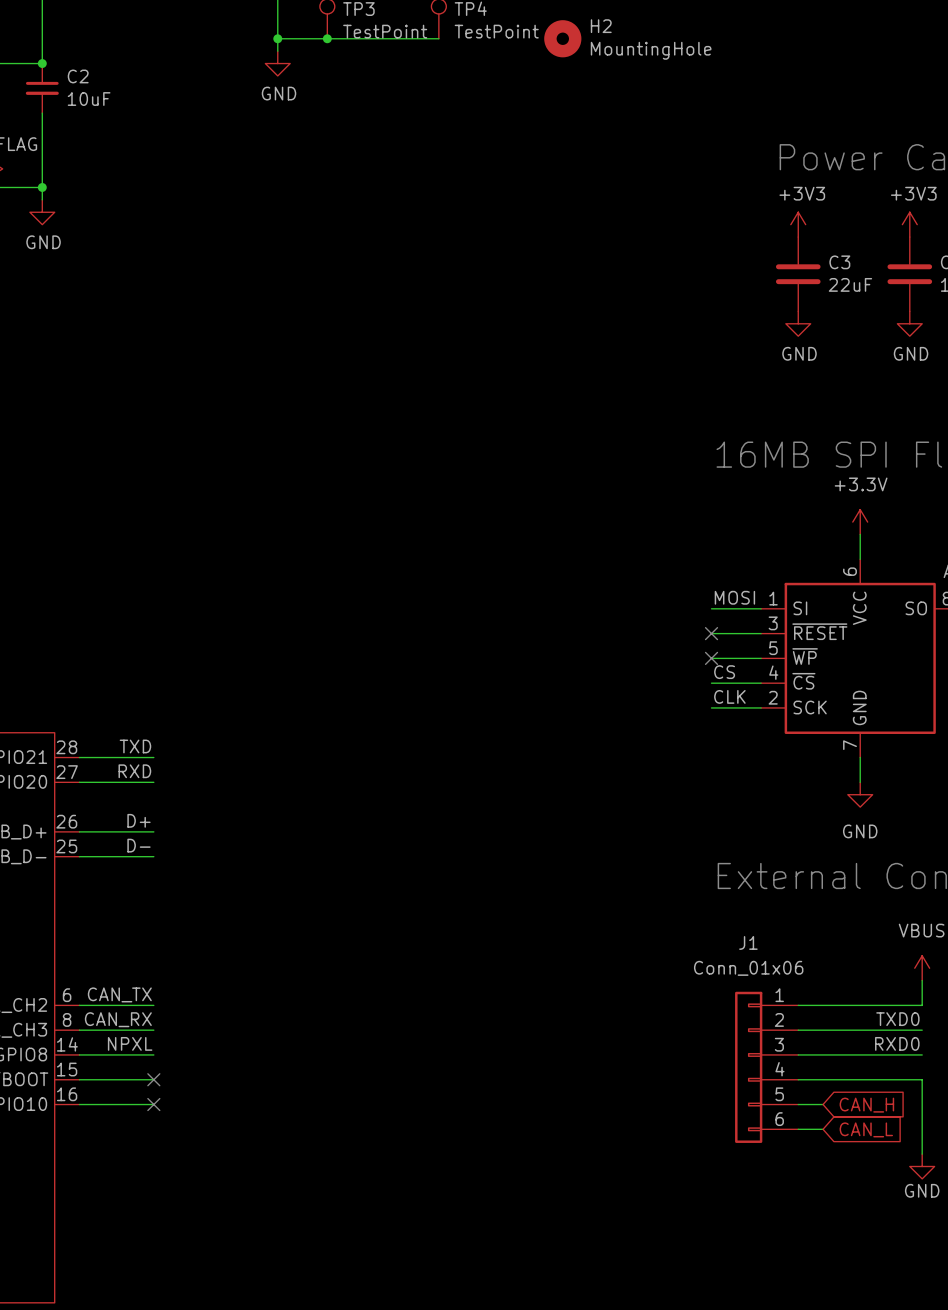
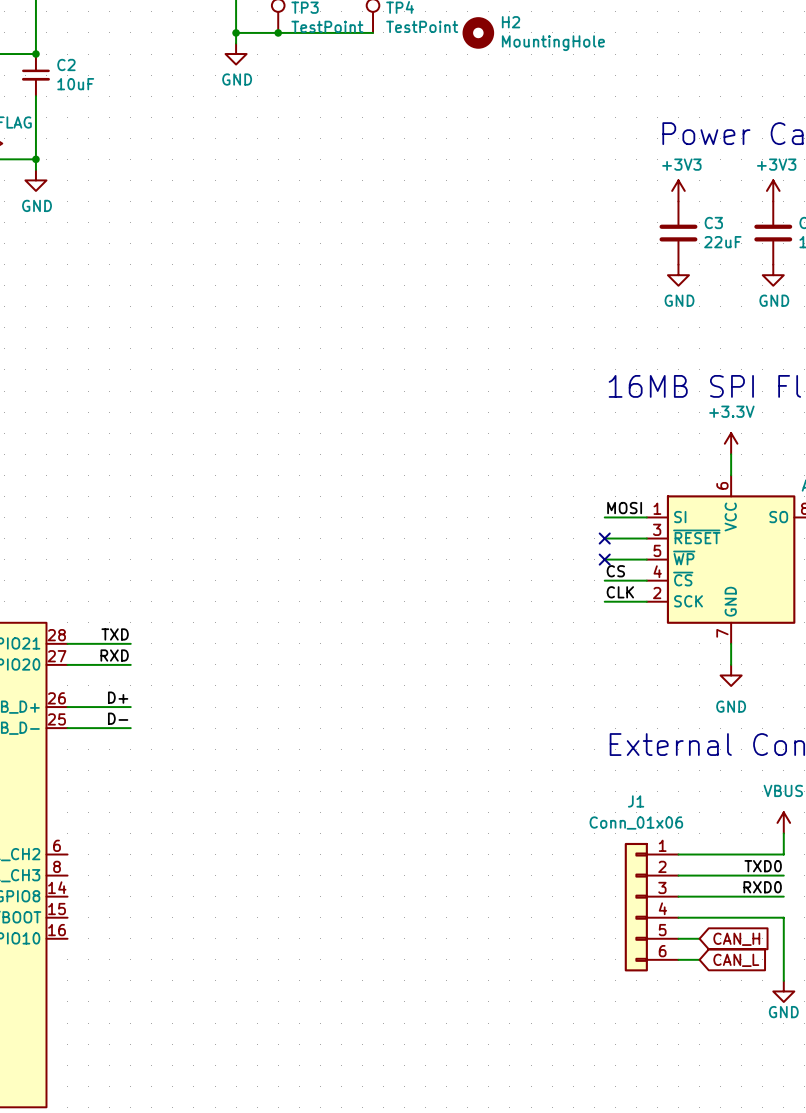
label: CAN_TX (119, 994) -> none
wire: (79, 1005) (153, 1005) -> none
label: CAN_RX (118, 1019) -> none
wire: (79, 1030) (153, 1030) -> none
label: NPXL (130, 1043) -> none
wire: (79, 1054) (153, 1054) -> none
wire: (79, 1079) (153, 1079) -> none
no-connect mark: (153, 1079) -> none
wire: (79, 1104) (153, 1104) -> none
no-connect mark: (153, 1104) -> none

